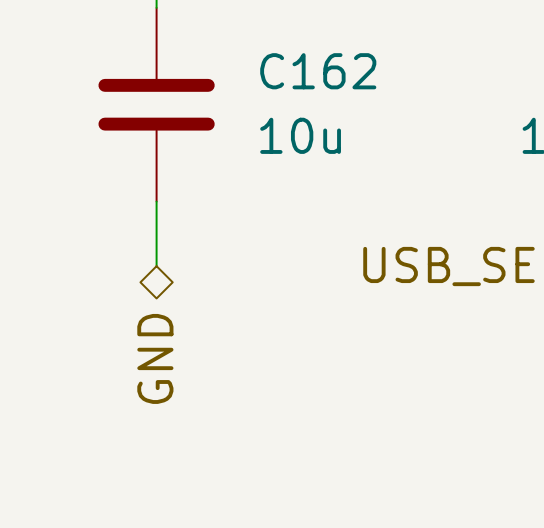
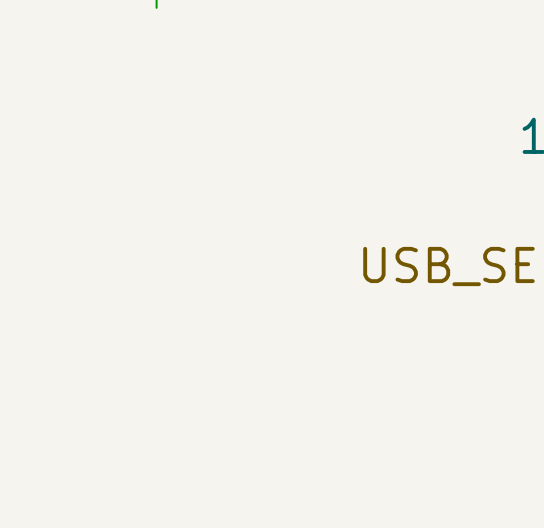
C162: 10u (156, 104) -> none
wire: (156, 201) (156, 266) -> none
hierarchical label: GND (155, 358) -> none

